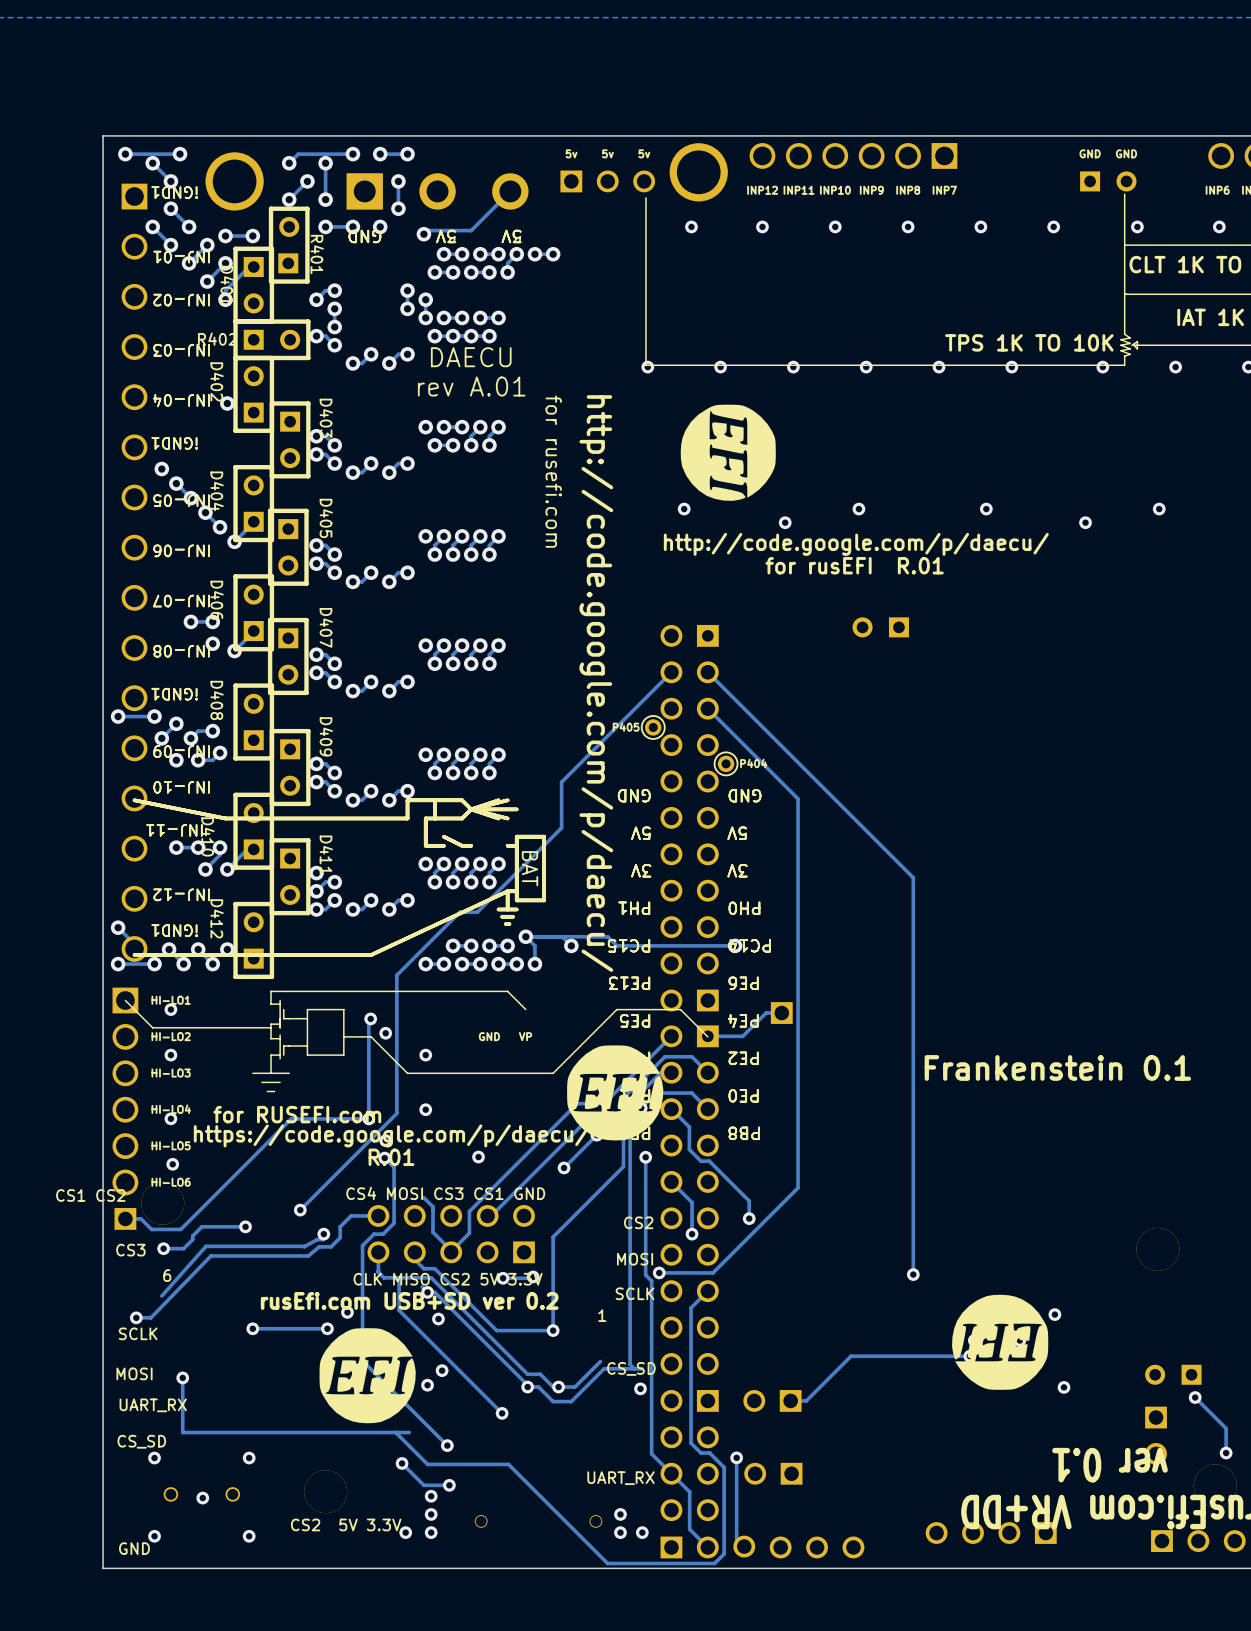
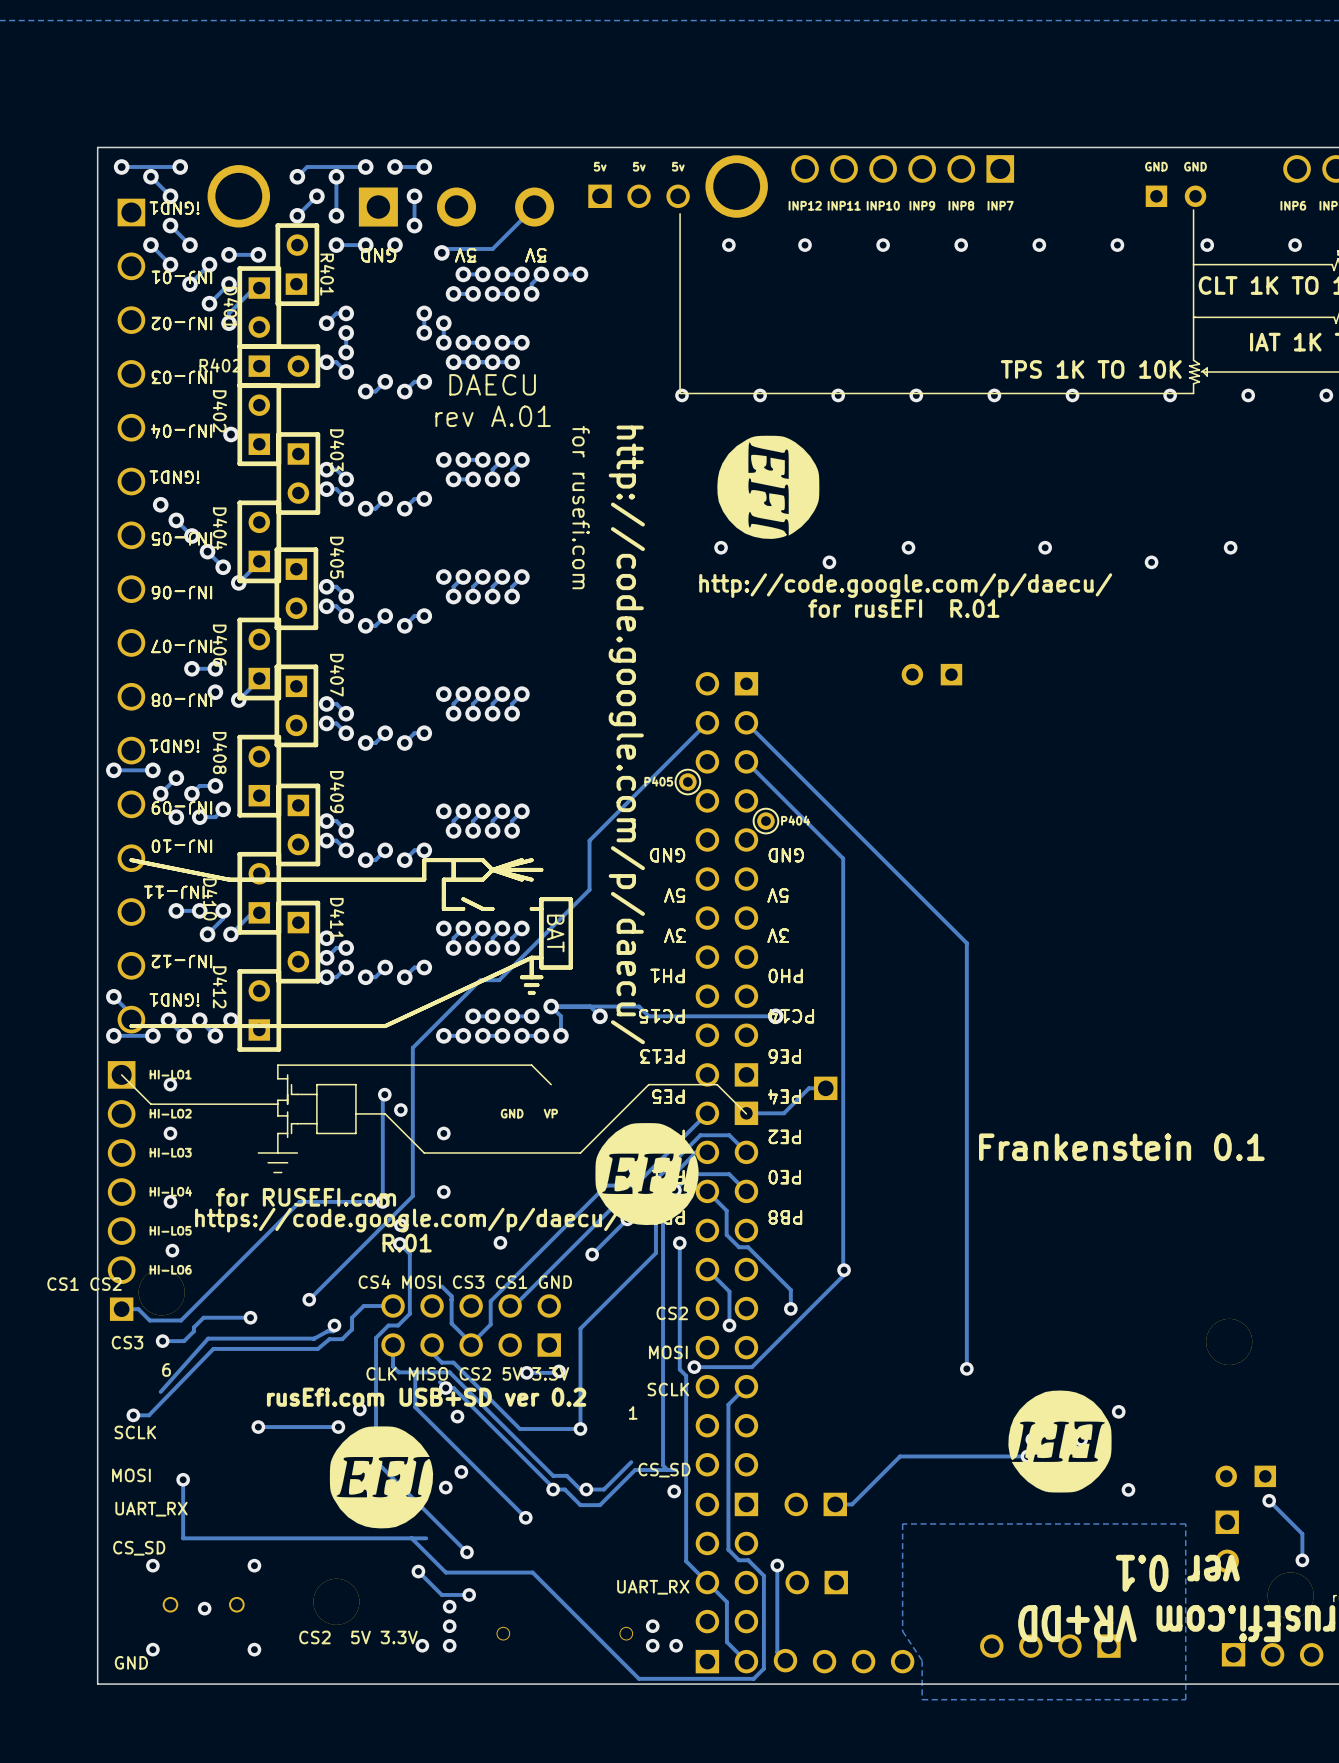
via: none -> (844, 1270)
zone outline: none -> (1185, 1523) (902, 1523) (902, 1631) (922, 1660) (922, 1699) (1185, 1699) (1185, 1523)

